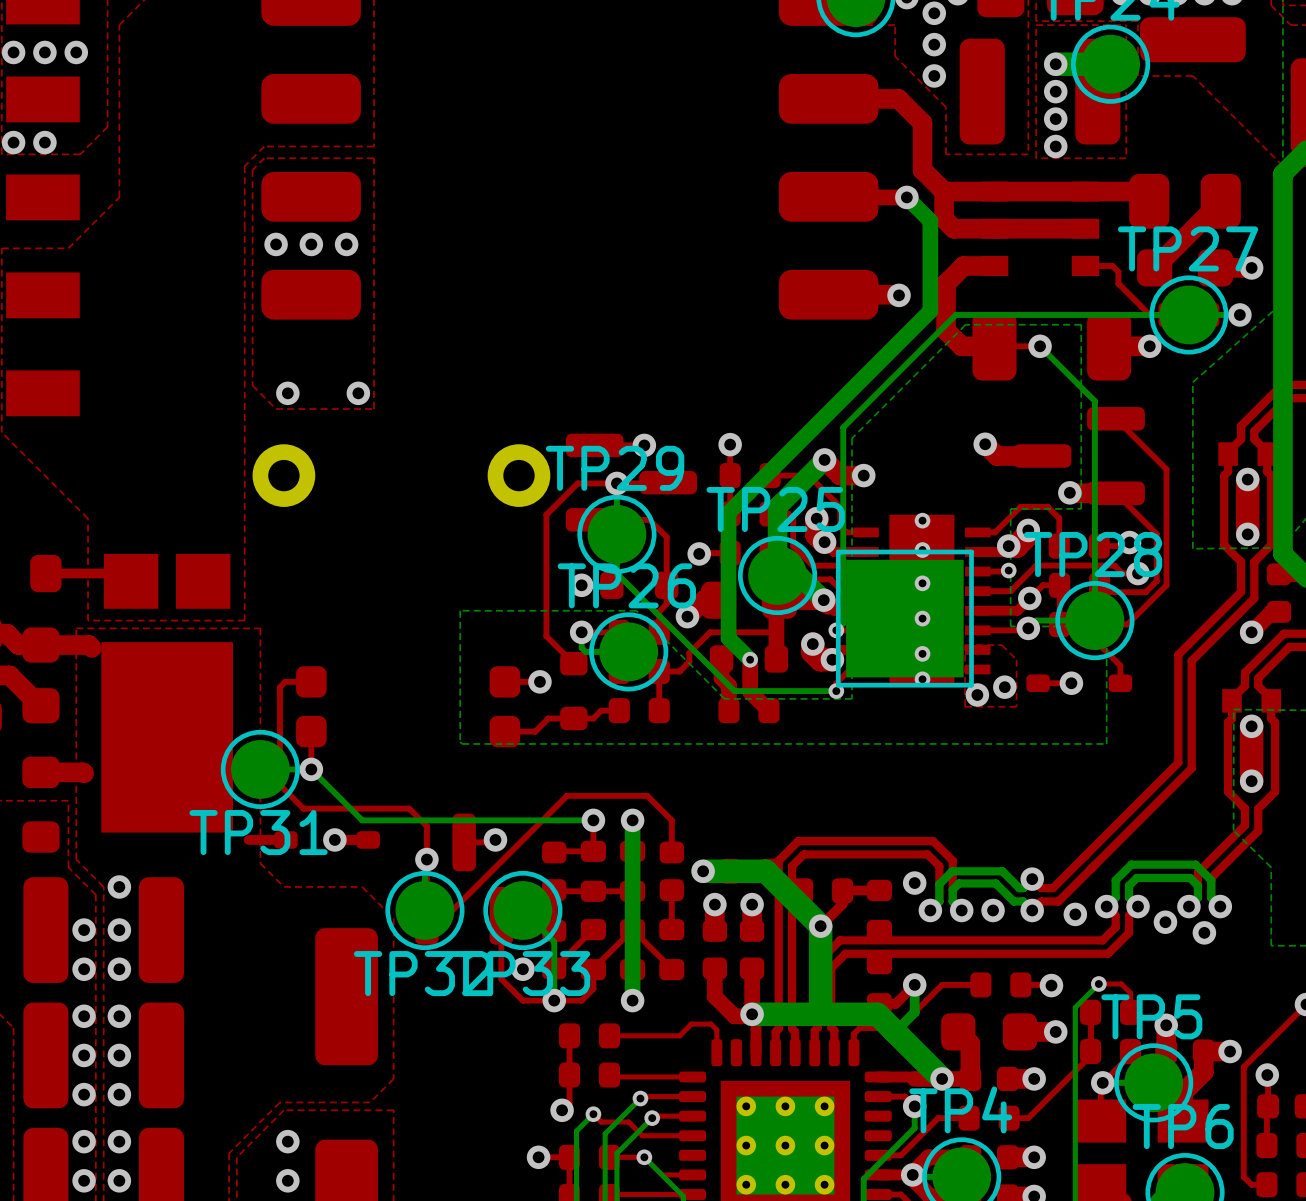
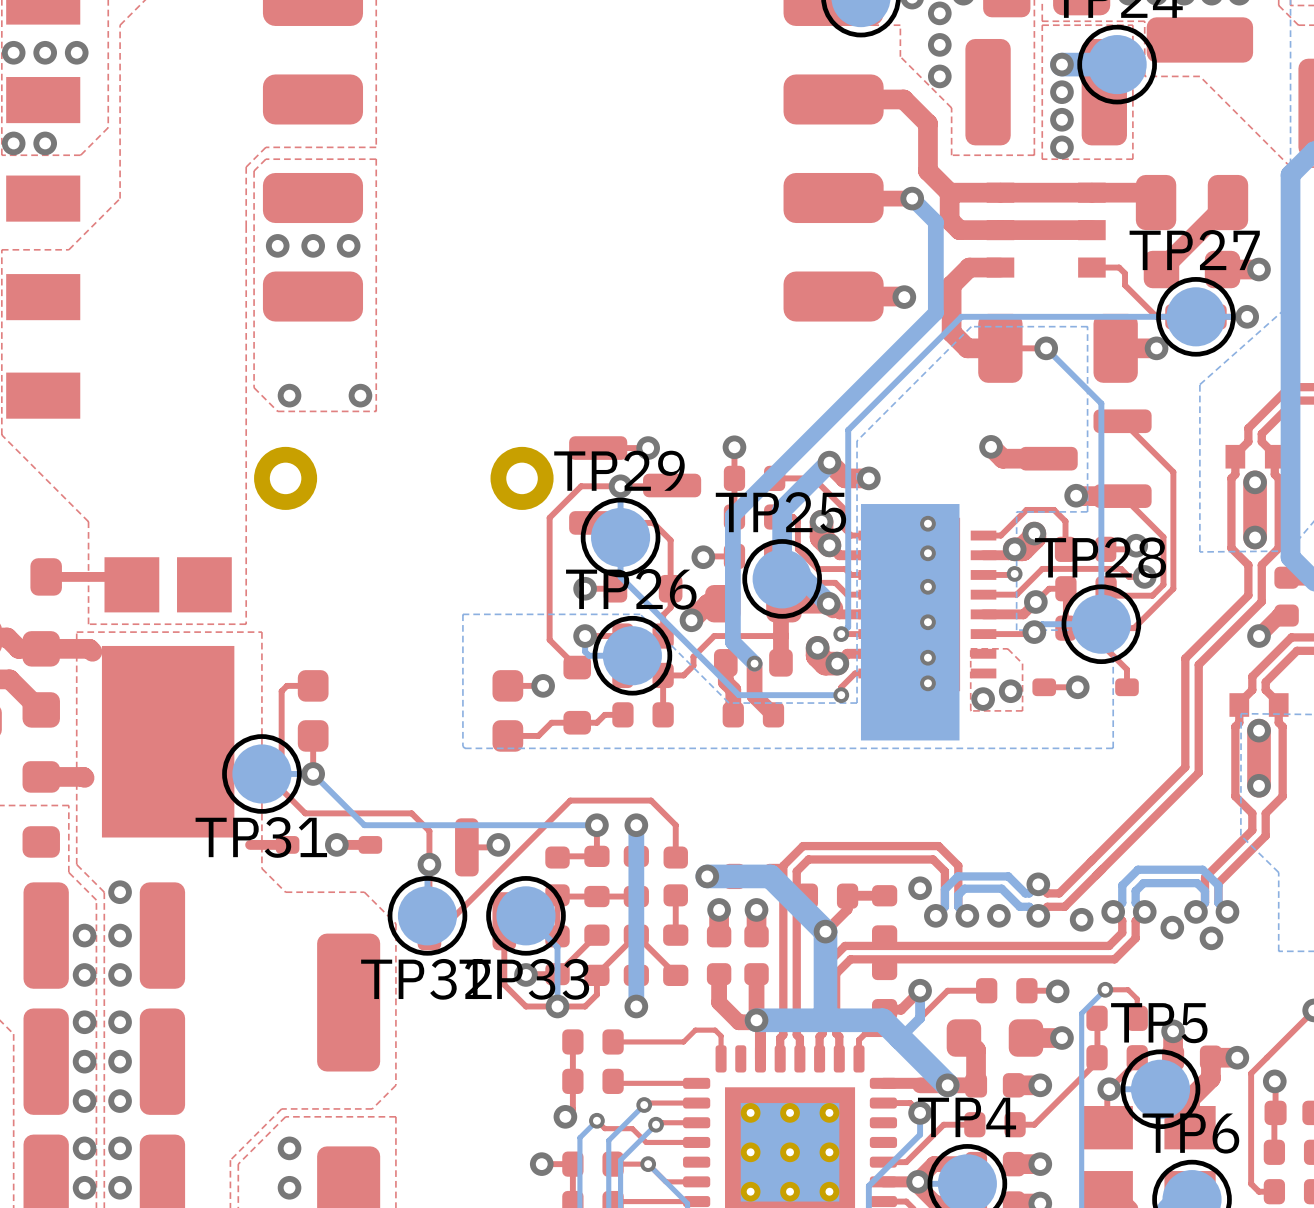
part footprint: [835, 549, 974, 688] -> [860, 504, 960, 741]

